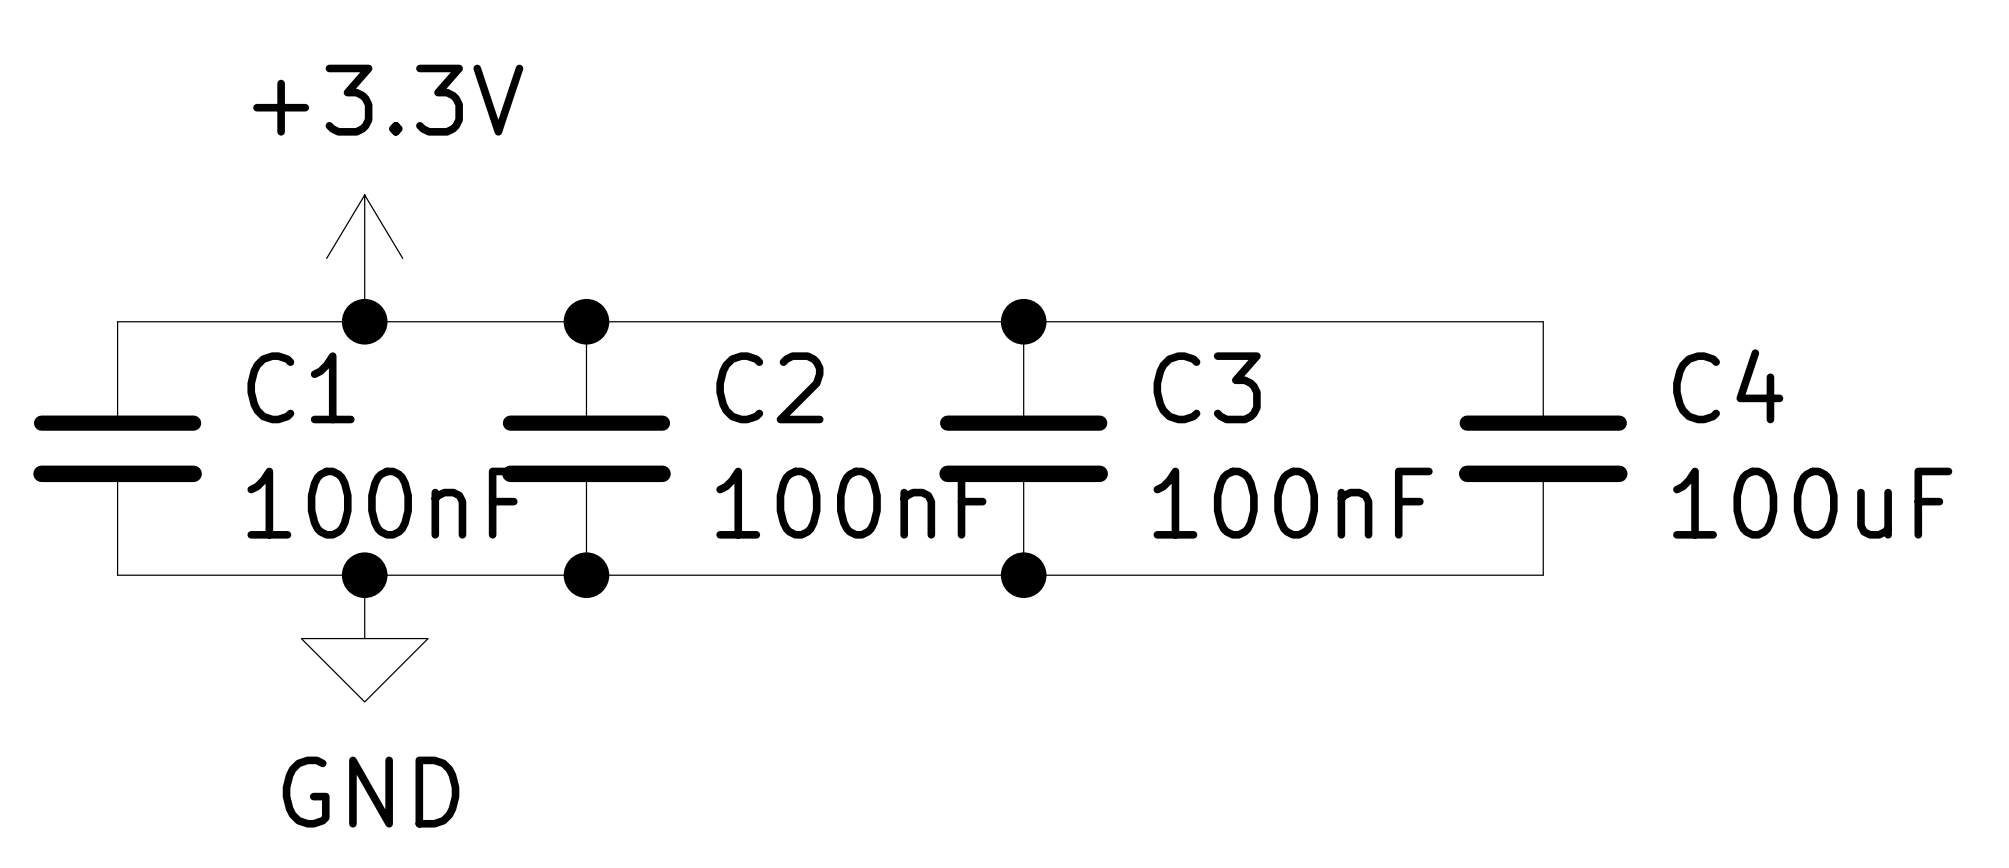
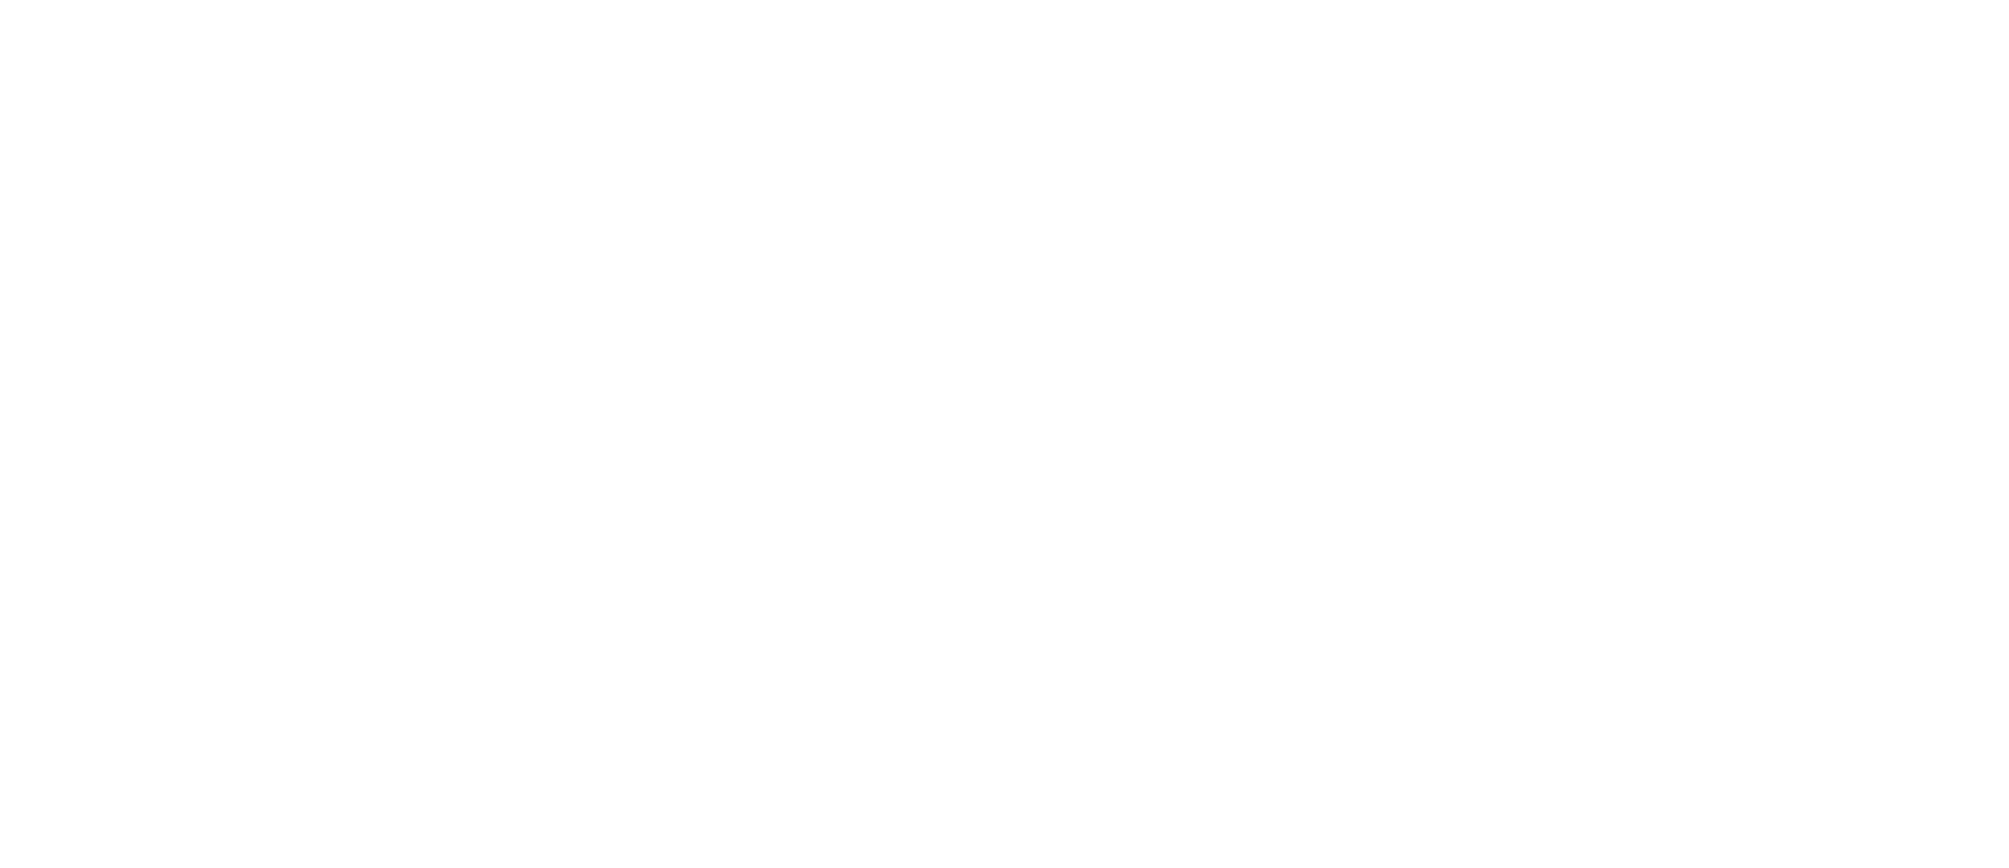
power symbol: +3.3V (364, 258) -> none
wire: (117, 321) (1543, 321) -> none
junction: (364, 321) -> none
junction: (586, 321) -> none
junction: (1023, 321) -> none
C1: 100nF (117, 448) -> none
C2: 100nF (586, 448) -> none
C3: 100nF (1023, 448) -> none
C4: 100uF (1543, 448) -> none
wire: (117, 575) (1543, 575) -> none
junction: (364, 575) -> none
junction: (586, 575) -> none
junction: (1023, 575) -> none
power symbol: GND (364, 638) -> none

